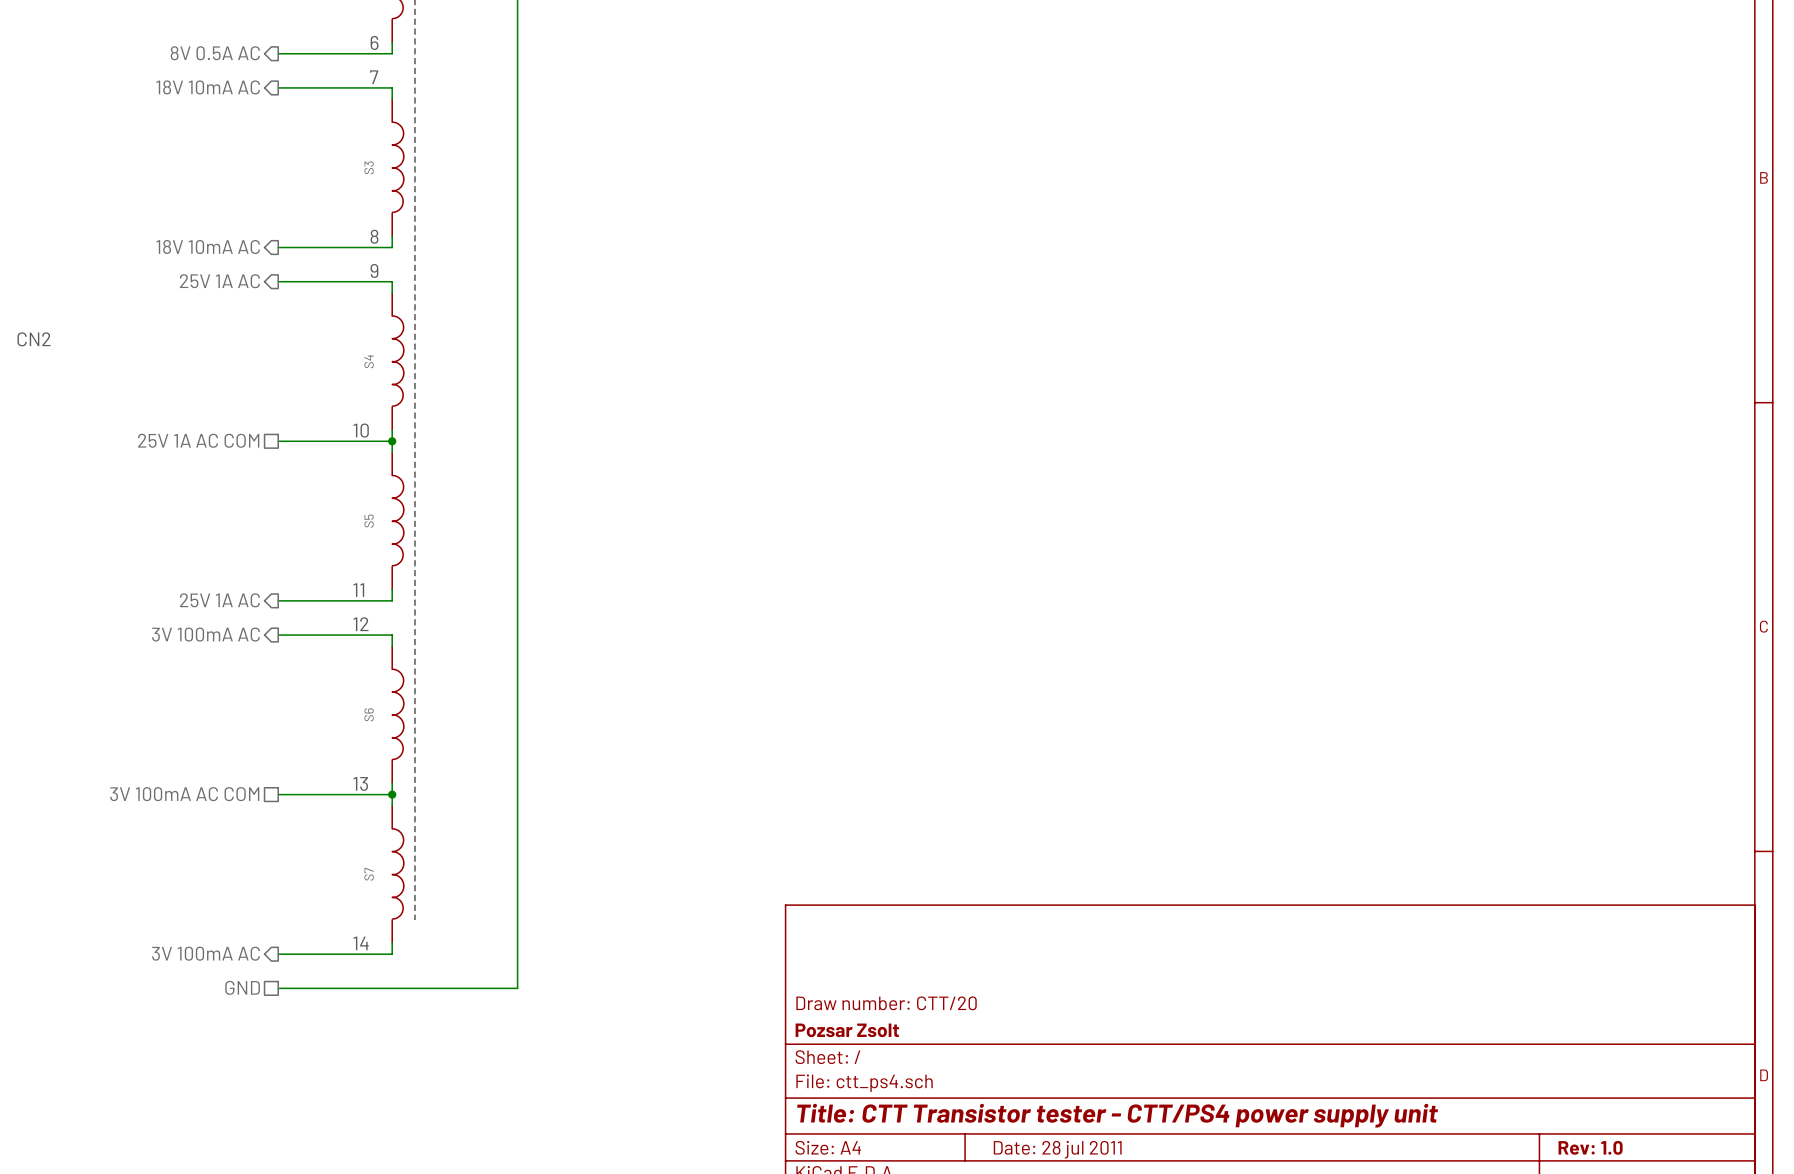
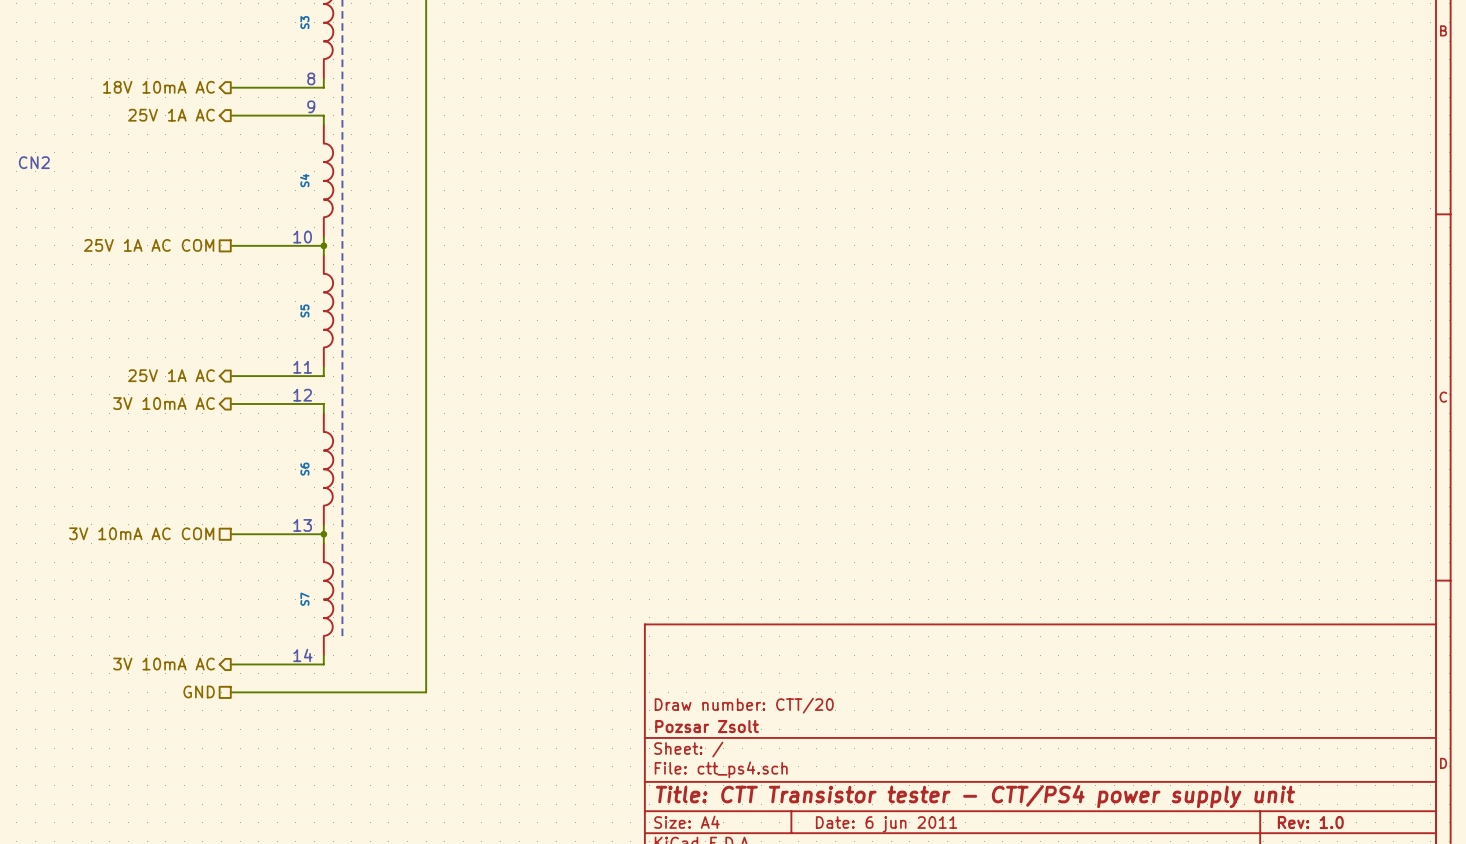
hierarchical label: 3V 100mA AC (205, 634) -> 3V 10mA AC (164, 403)
hierarchical label: 3V 100mA AC COM (184, 794) -> 3V 10mA AC COM (141, 533)
hierarchical label: 3V 100mA AC (205, 953) -> 3V 10mA AC (164, 664)
title block: Date: 28 jul 2011 (1057, 1149) -> Date: 6 jun 2011 (886, 824)

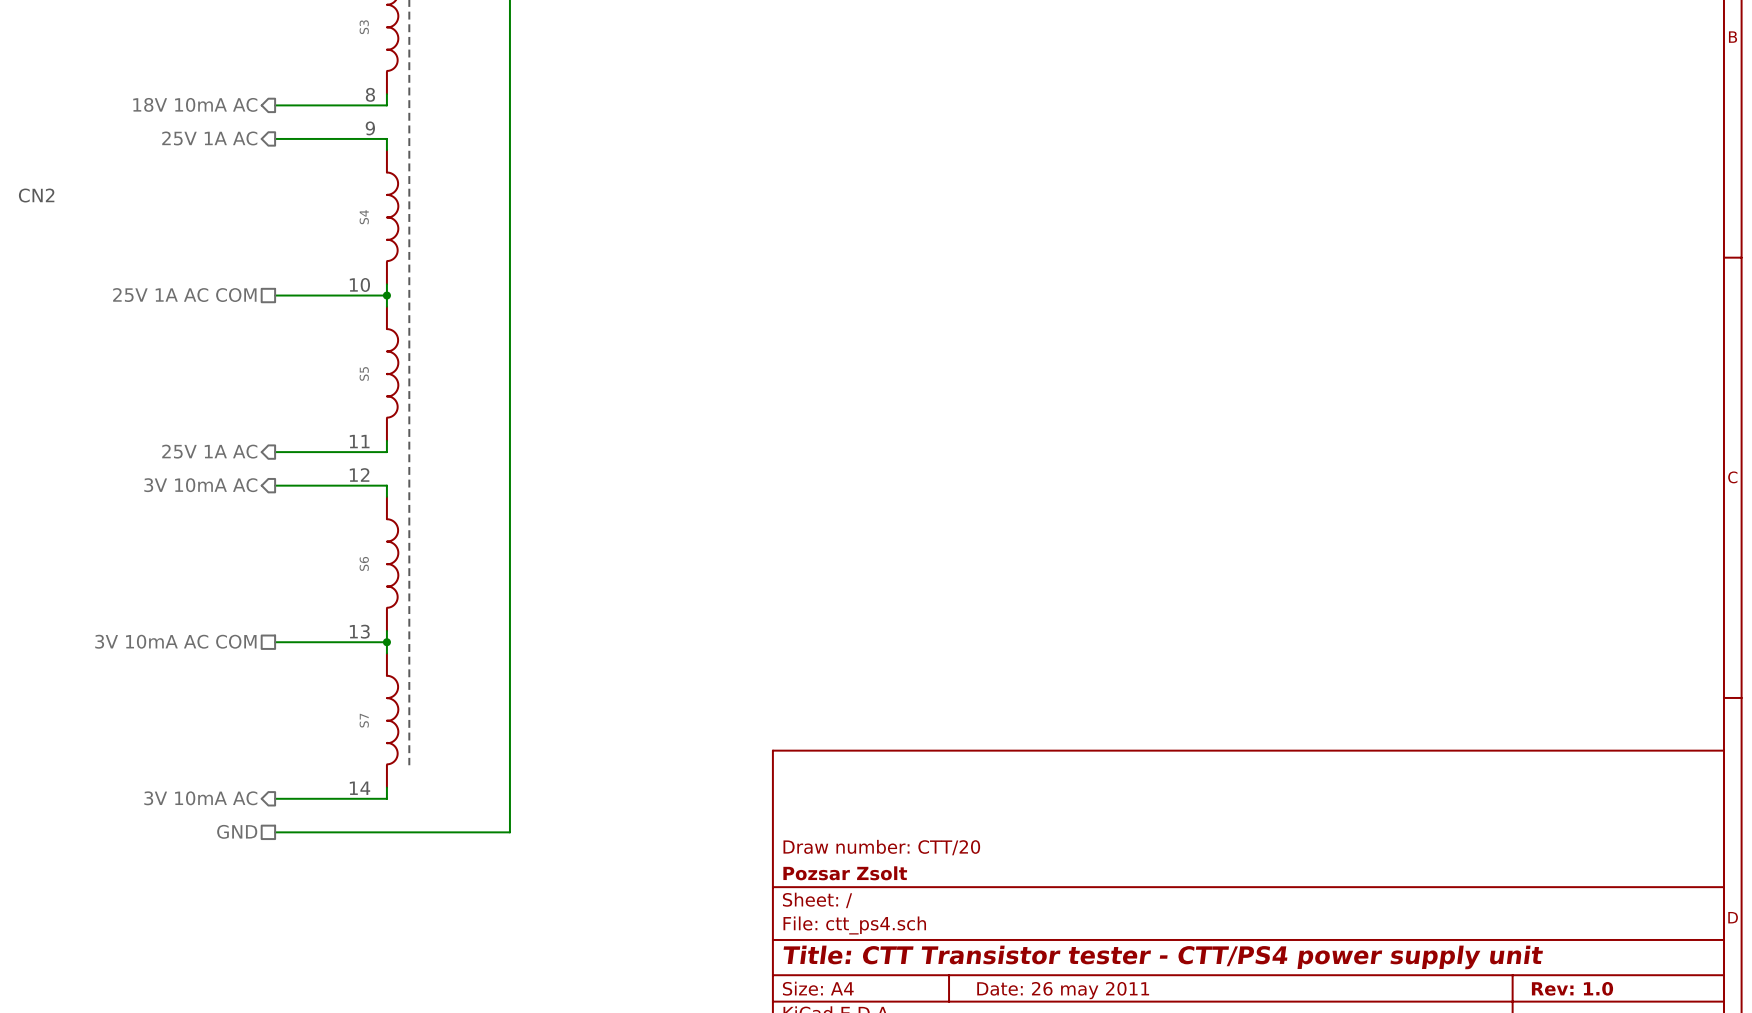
title block: Date: 6 jun 2011 (886, 824) -> Date: 26 may 2011 (1063, 990)

